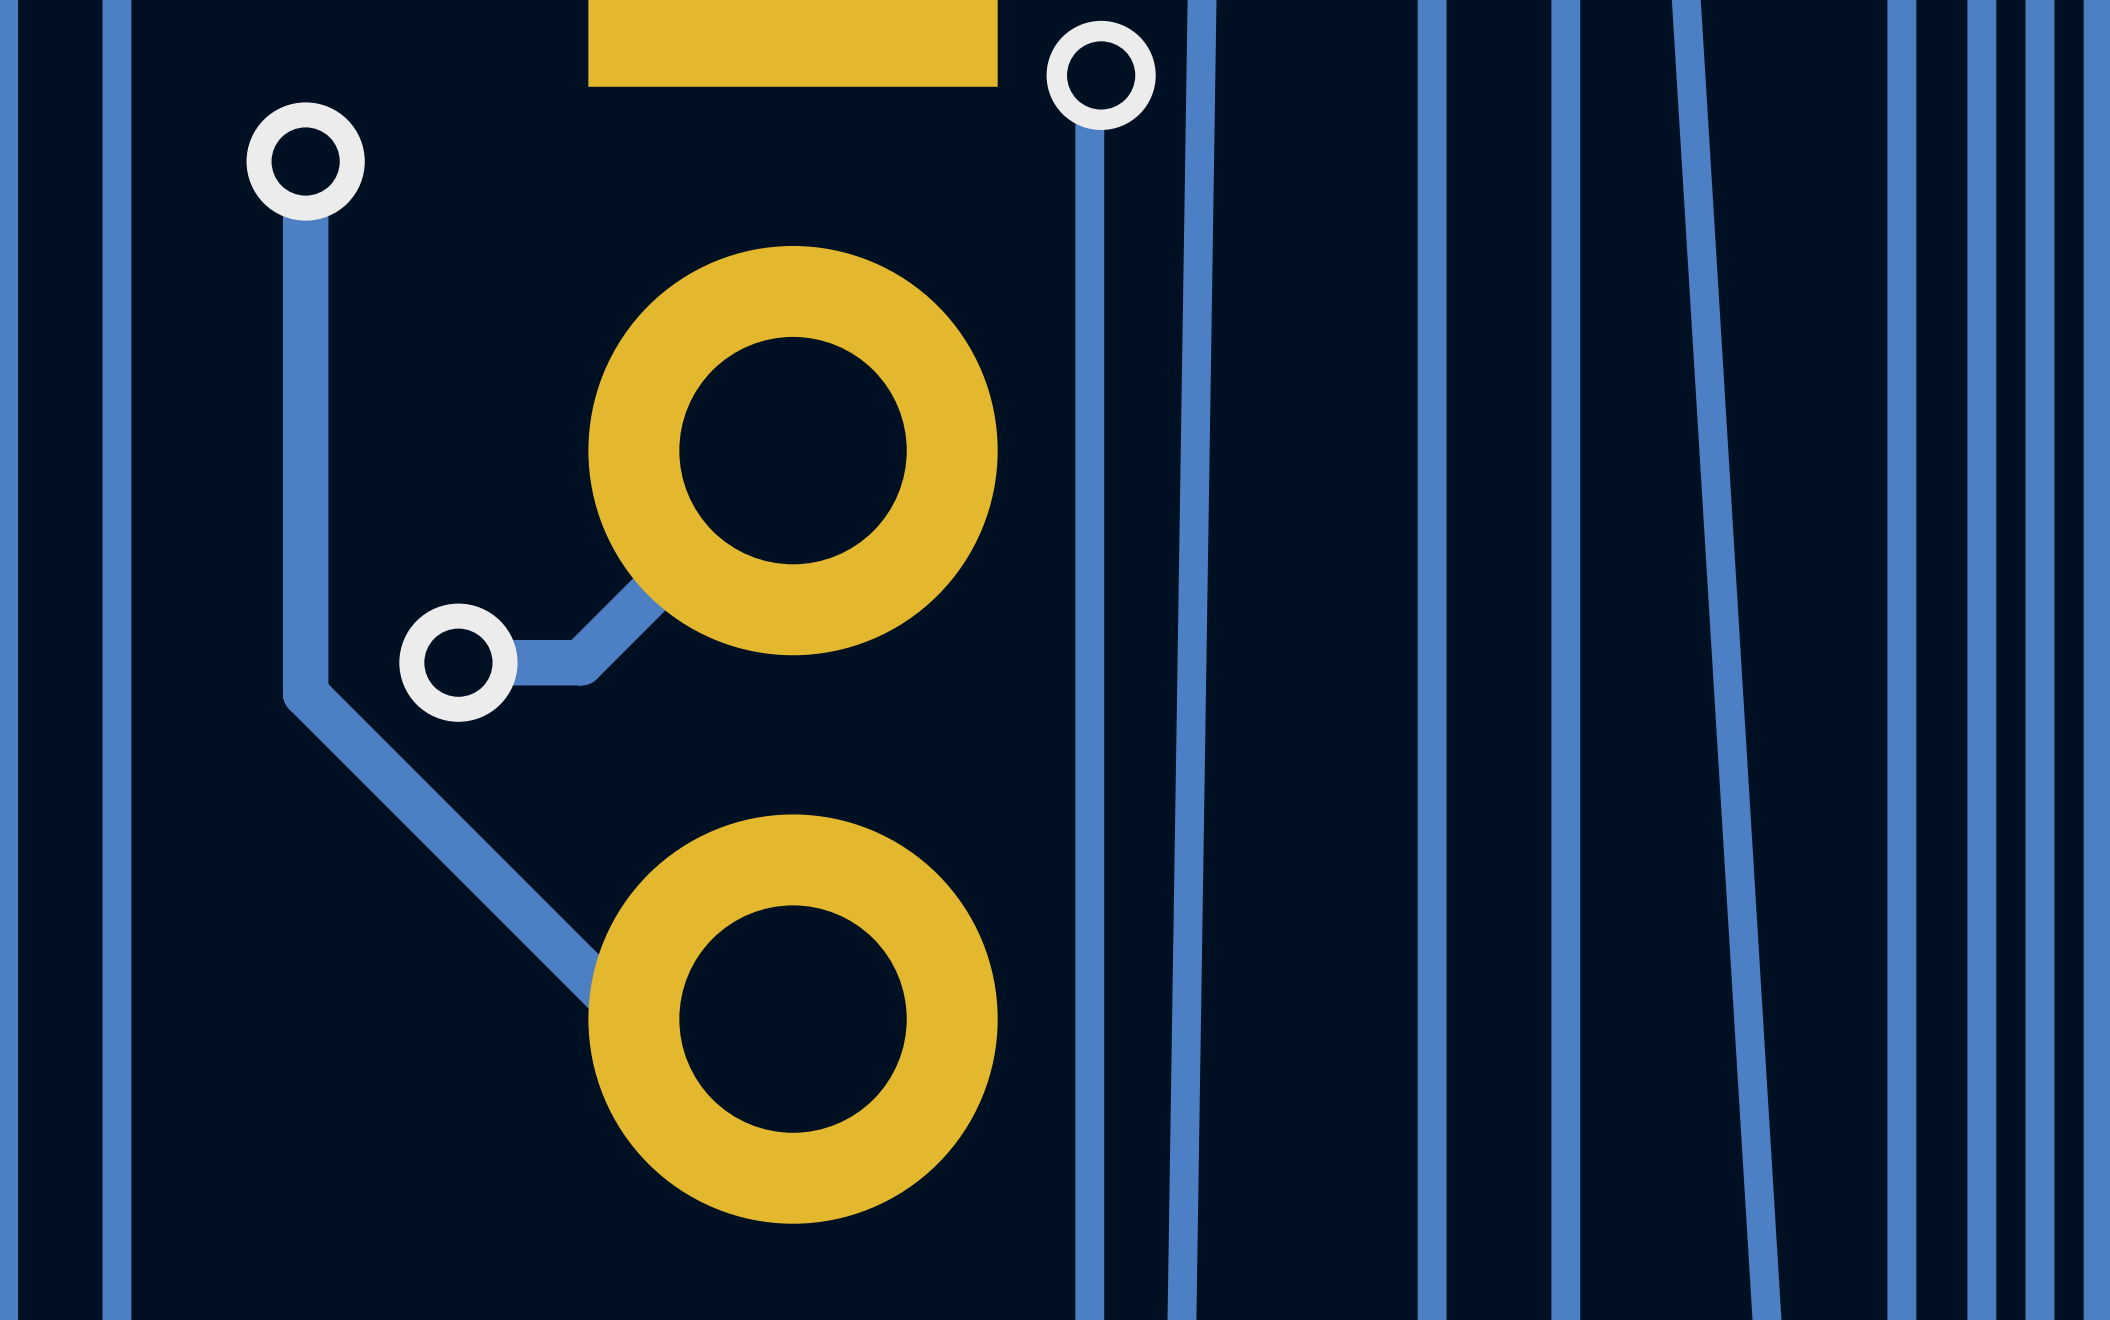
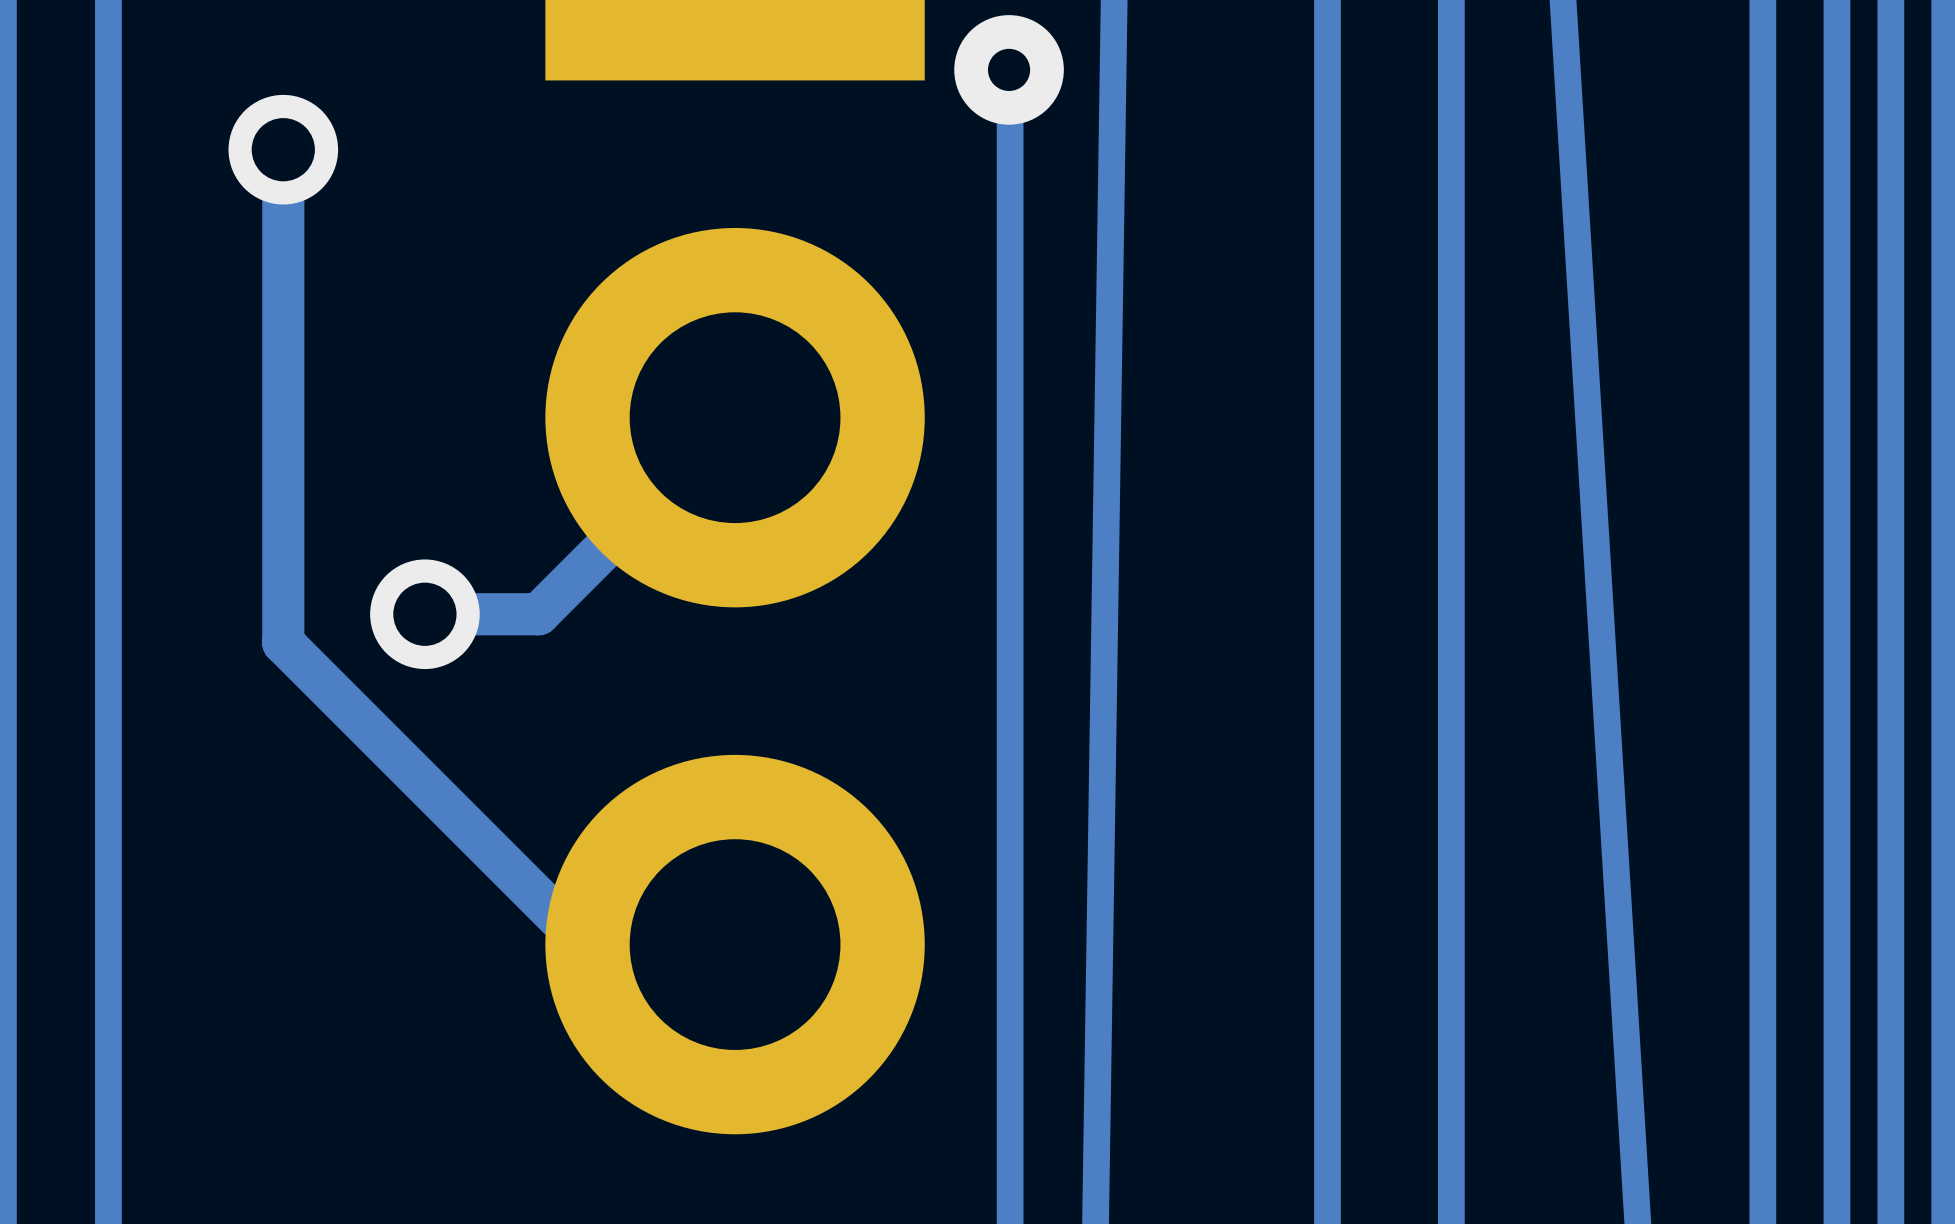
via size: [1046, 20, 1156, 131] -> [954, 15, 1064, 125]

